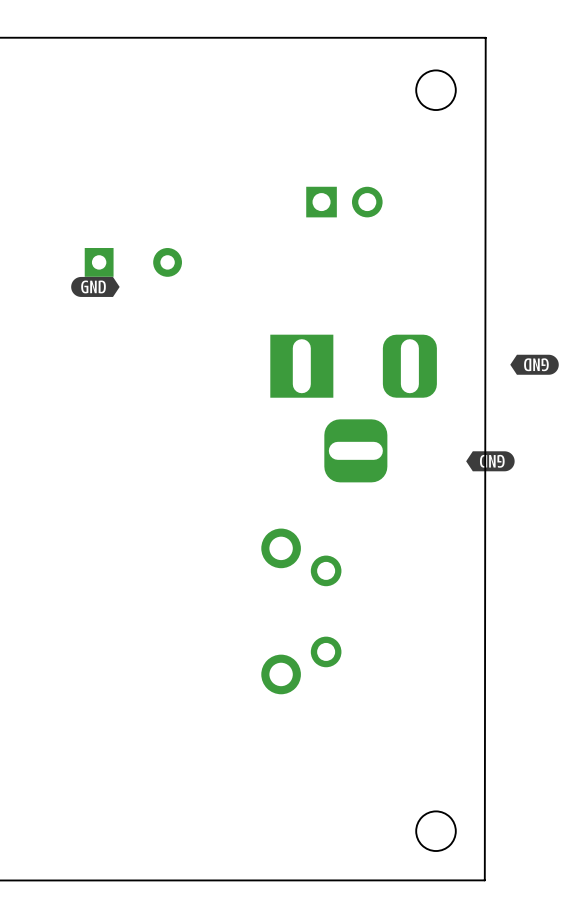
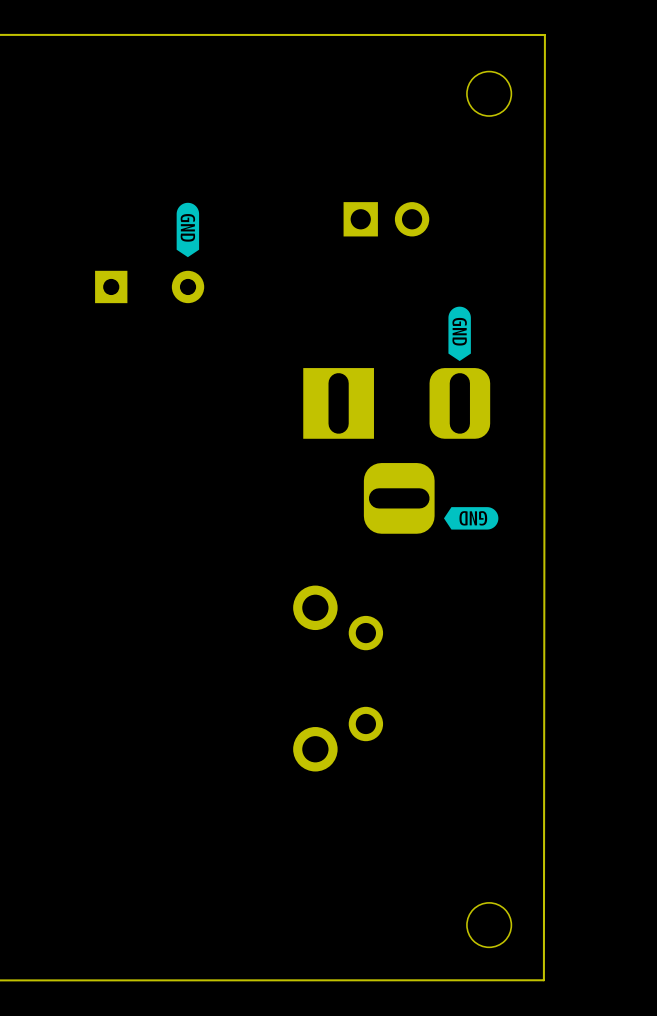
drawing: none -> [176, 202, 200, 258]
drawing: [71, 276, 120, 297] -> none
drawing: none -> [448, 306, 471, 362]
drawing: [510, 354, 559, 375] -> none
drawing position: (490, 461) -> (471, 518)

